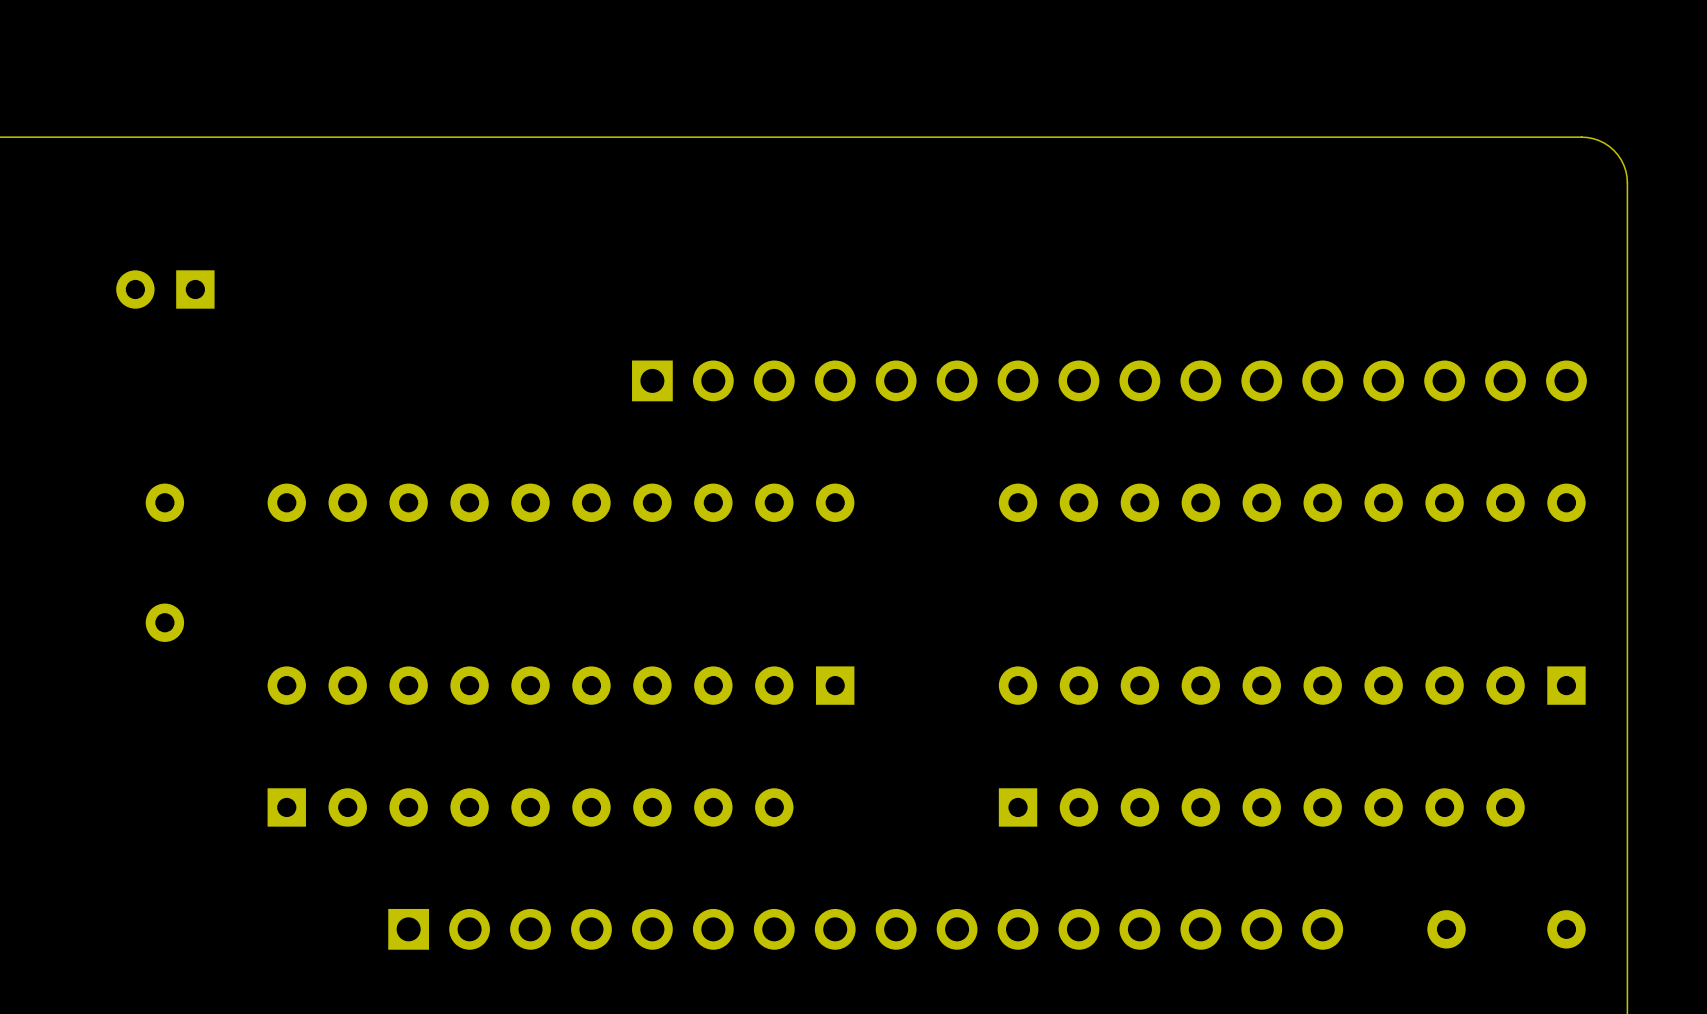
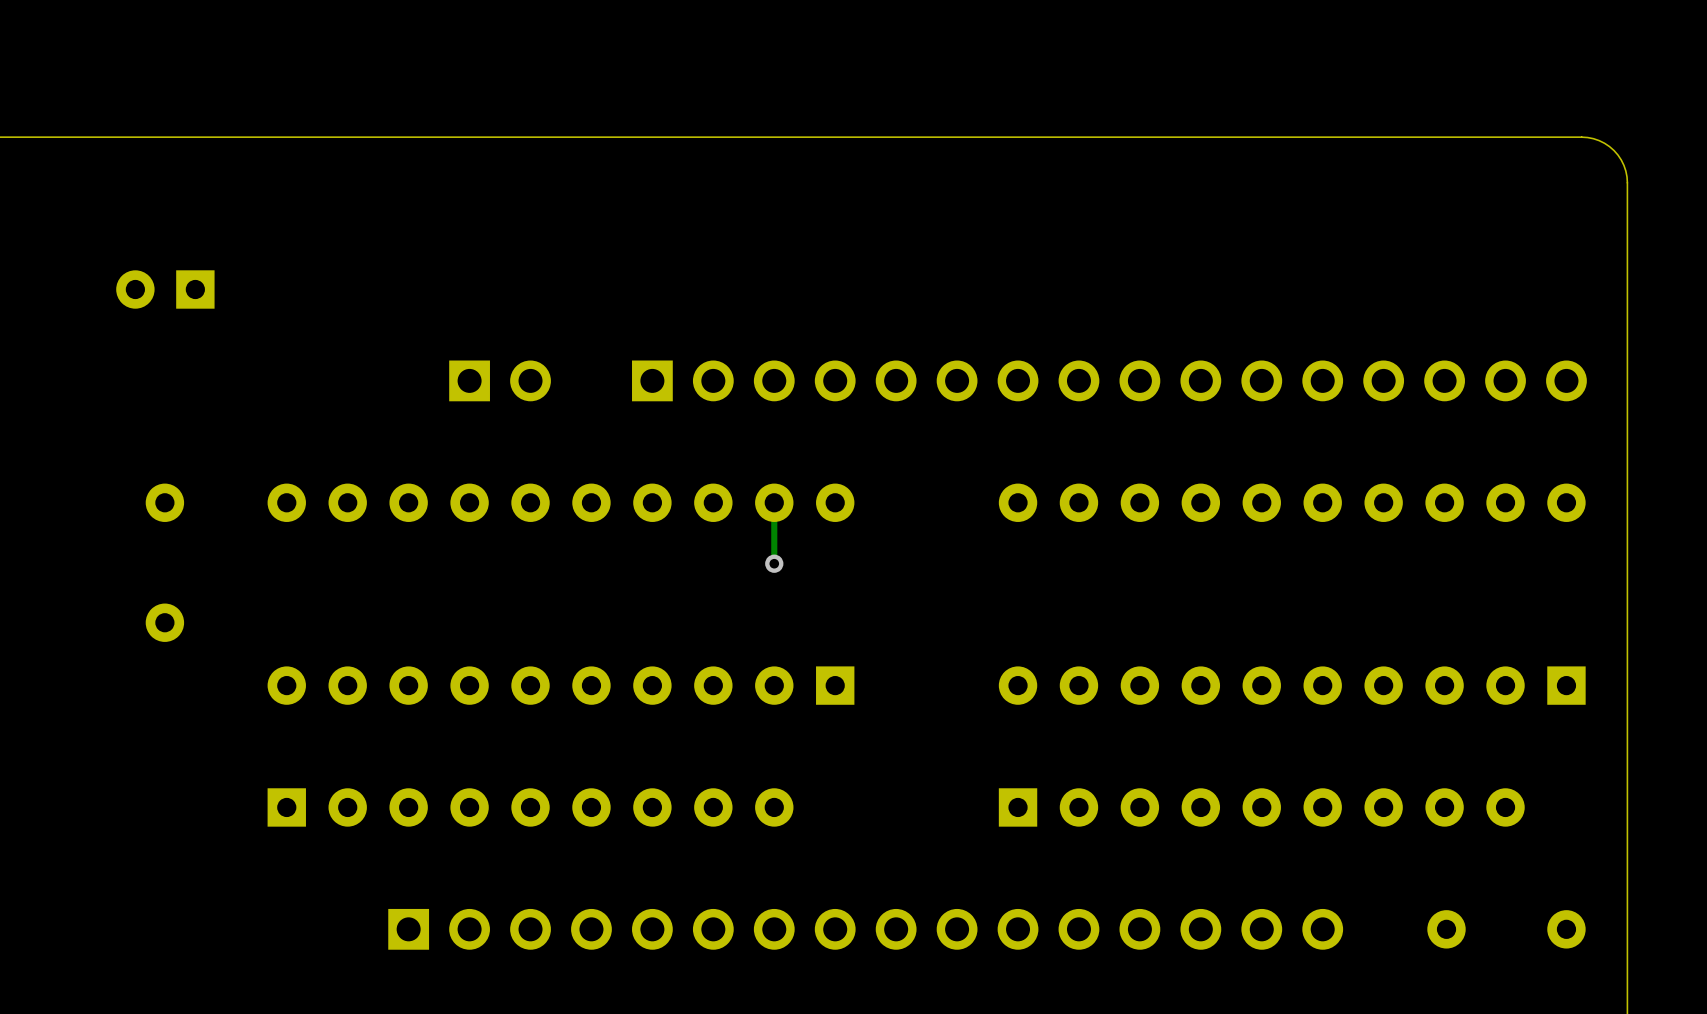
part: none -> (500, 380)
track: none -> (774, 502) (774, 563)
via: none -> (774, 563)

